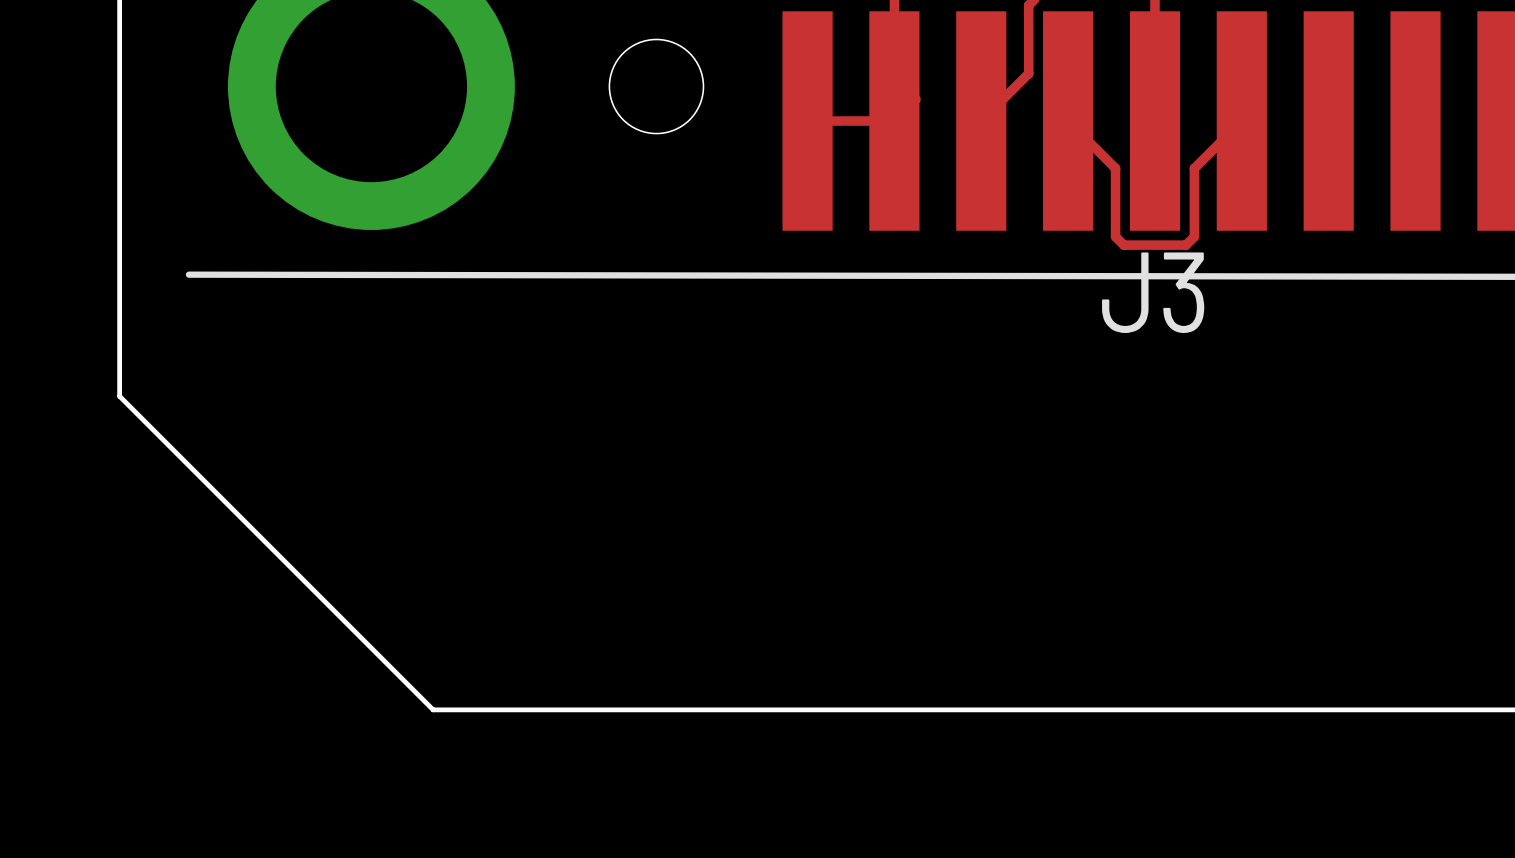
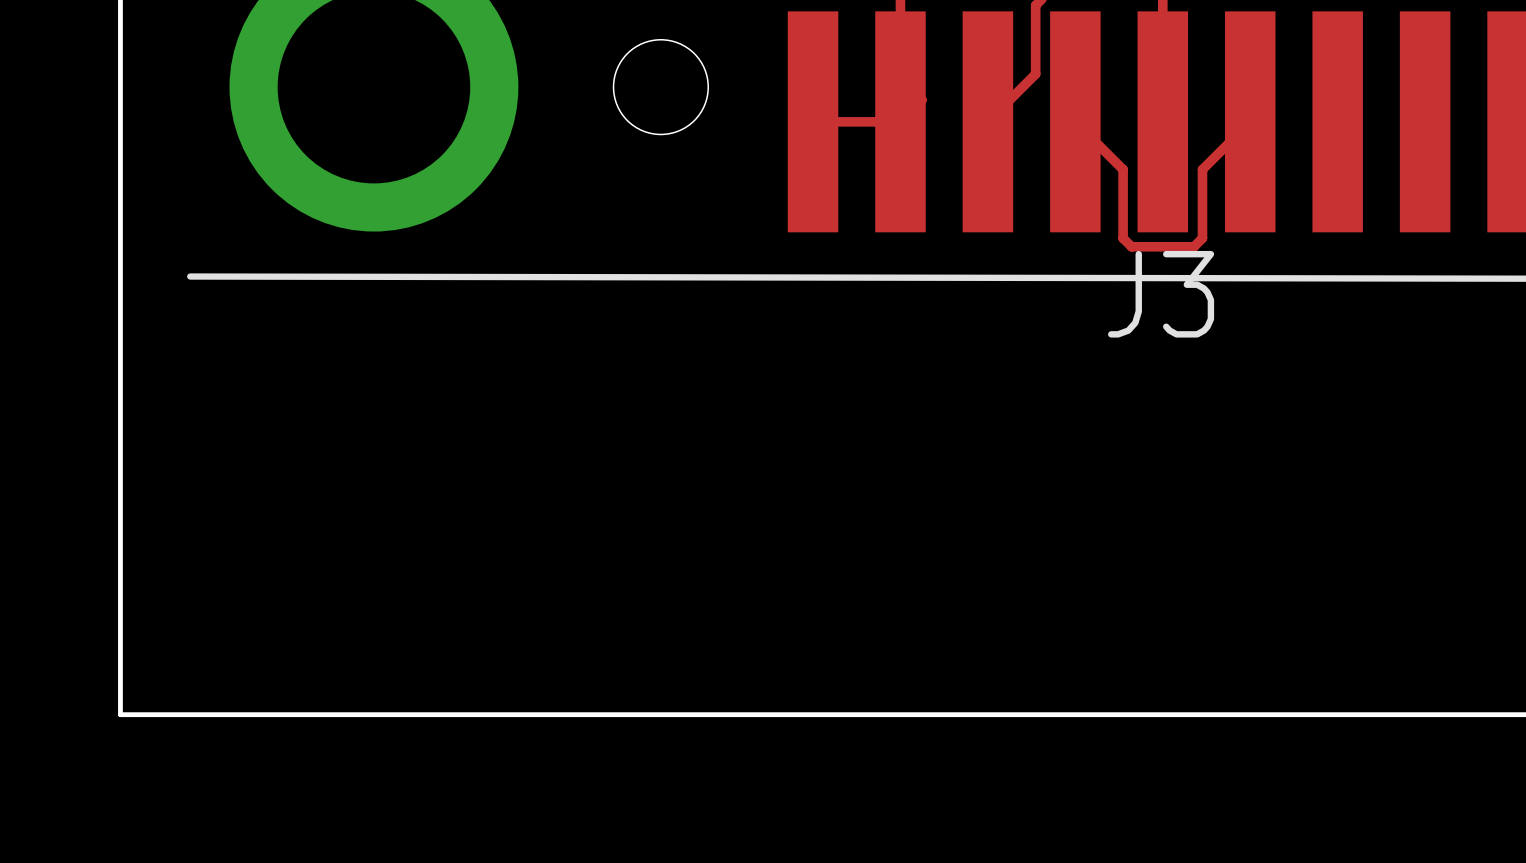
board edge: (119, 396) (433, 709) -> (120, 399) (120, 714) (436, 714)

